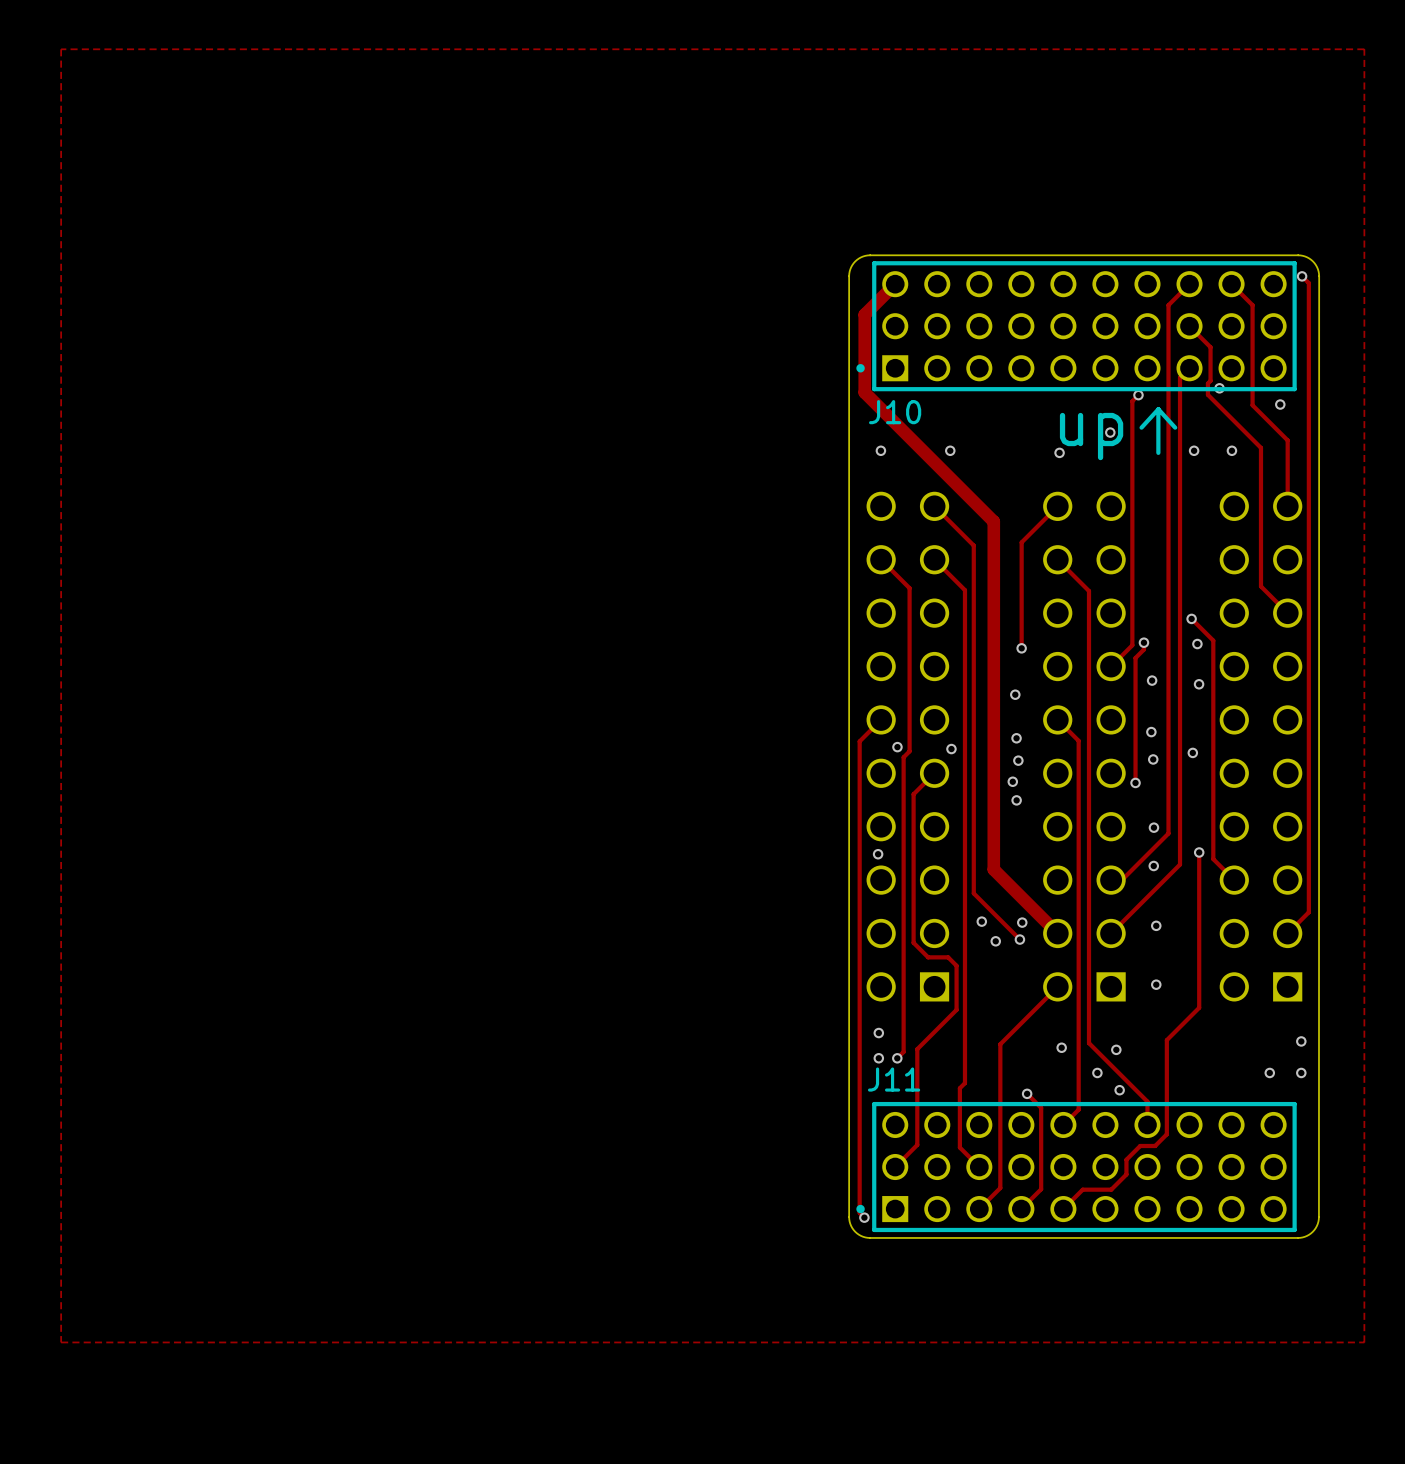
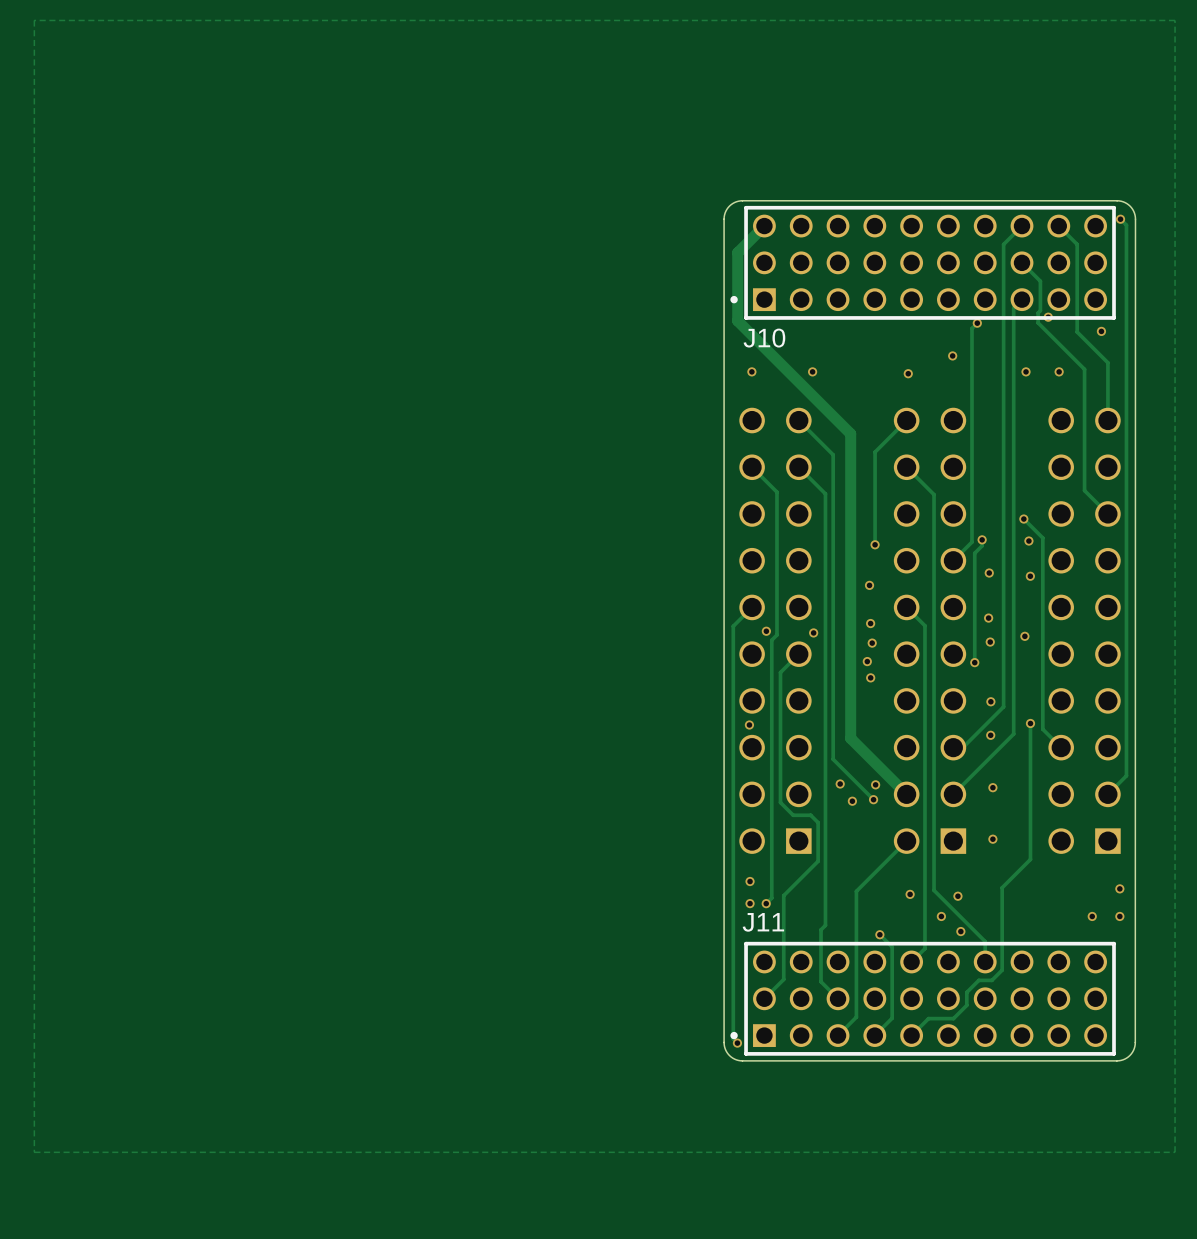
line: (1158, 409) (1175, 427) -> none
line: (1158, 409) (1158, 452) -> none
line: (1158, 409) (1141, 427) -> none
text: up (1091, 436) -> none

